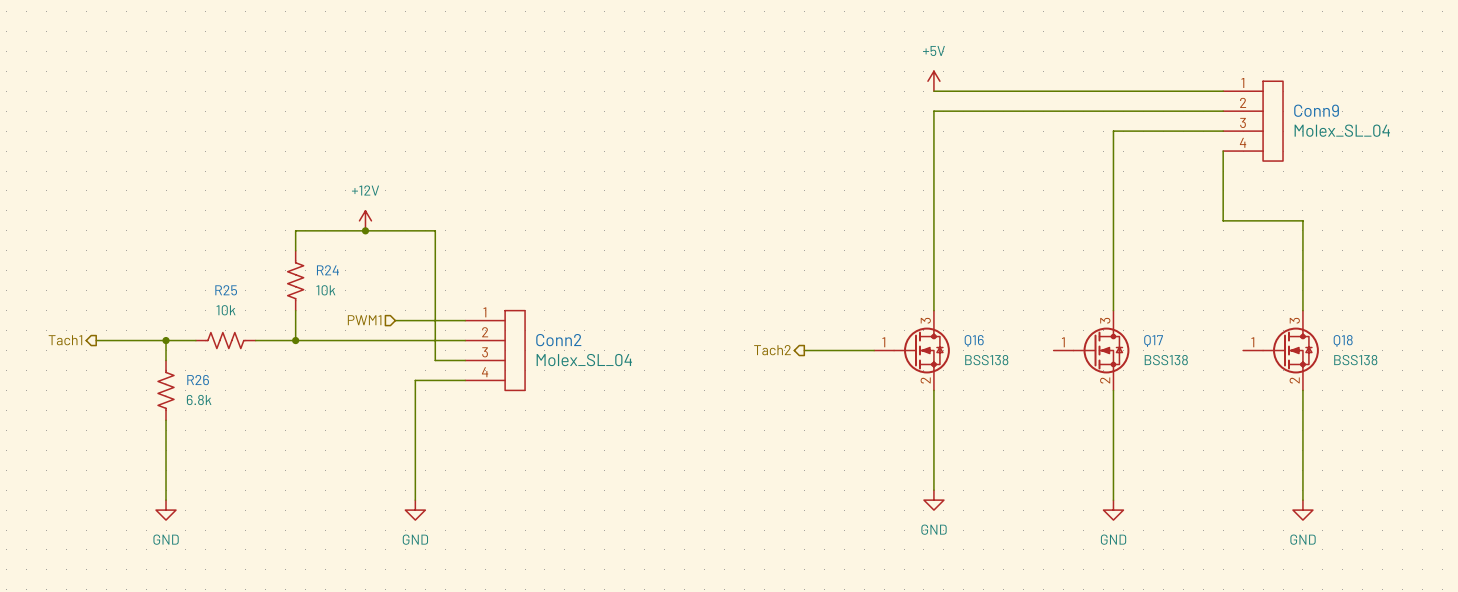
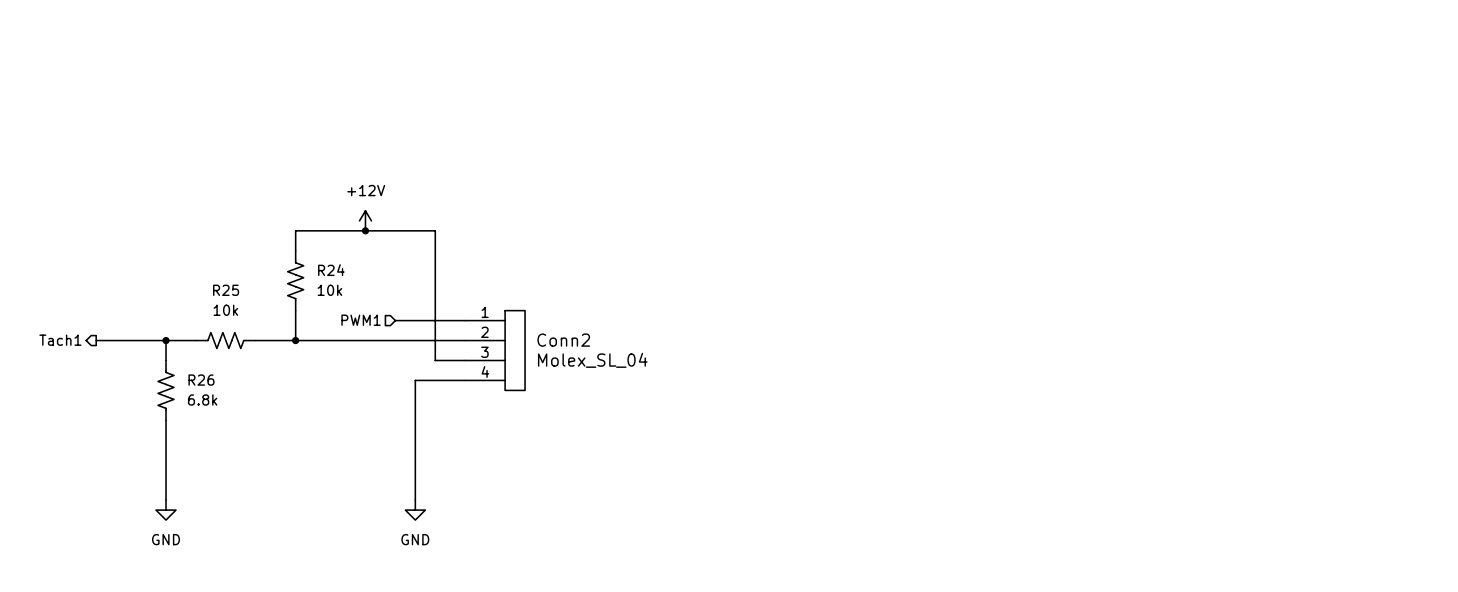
power symbol: +5V (933, 81) -> none
wire: (933, 91) (1223, 91) -> none
wire: (1223, 111) (933, 111) (933, 310) -> none
Conn9: Molex_SL_04 (1253, 121) -> none
wire: (1223, 131) (1113, 131) (1113, 310) -> none
wire: (1223, 151) (1223, 220) (1302, 220) (1302, 310) -> none
hierarchical label: Tach2 (772, 350) -> none
wire: (804, 350) (874, 350) -> none
Q16: BSS138 (912, 350) -> none
Q17: BSS138 (1091, 350) -> none
Q18: BSS138 (1281, 350) -> none
wire: (933, 390) (933, 490) -> none
wire: (1113, 390) (1113, 500) -> none
wire: (1302, 390) (1302, 500) -> none
power symbol: GND (933, 500) -> none
power symbol: GND (1113, 510) -> none
power symbol: GND (1302, 510) -> none

